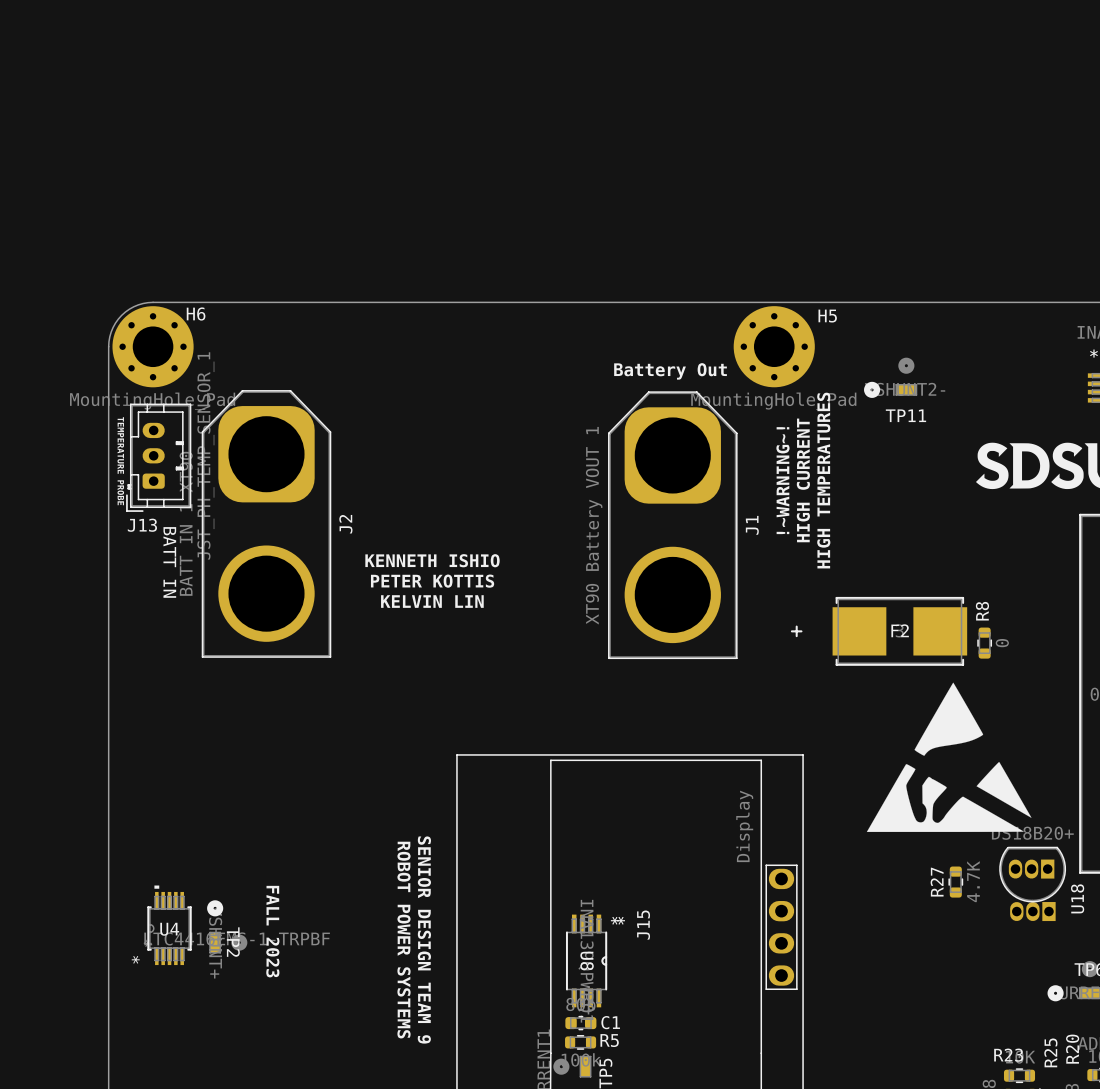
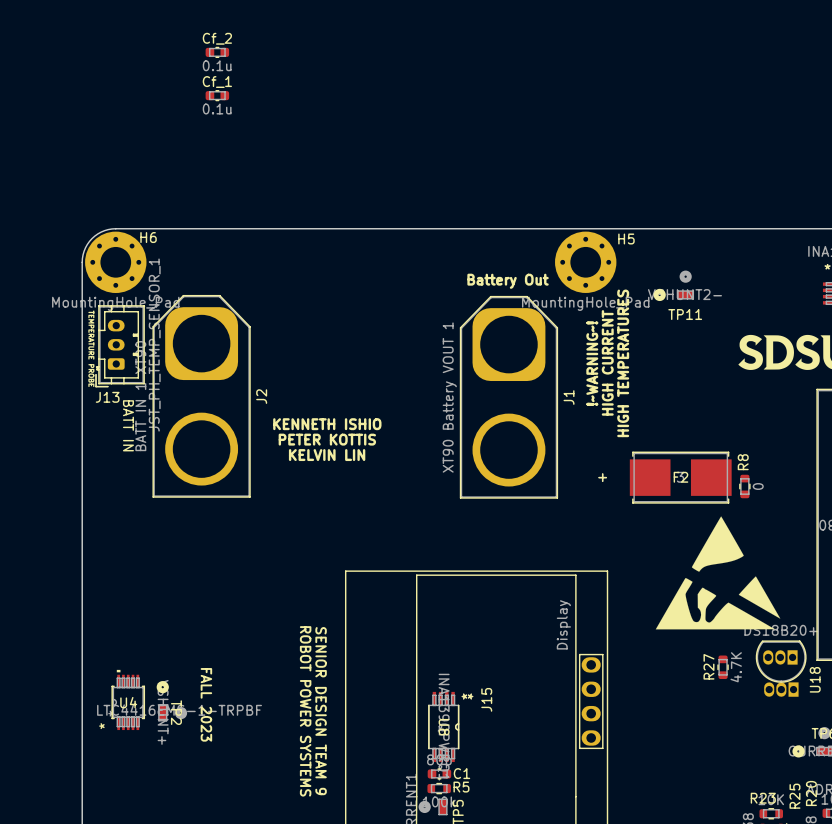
Cf_2: none -> 0.1u (217, 52)
Cf_1: none -> 0.1u (217, 95)

